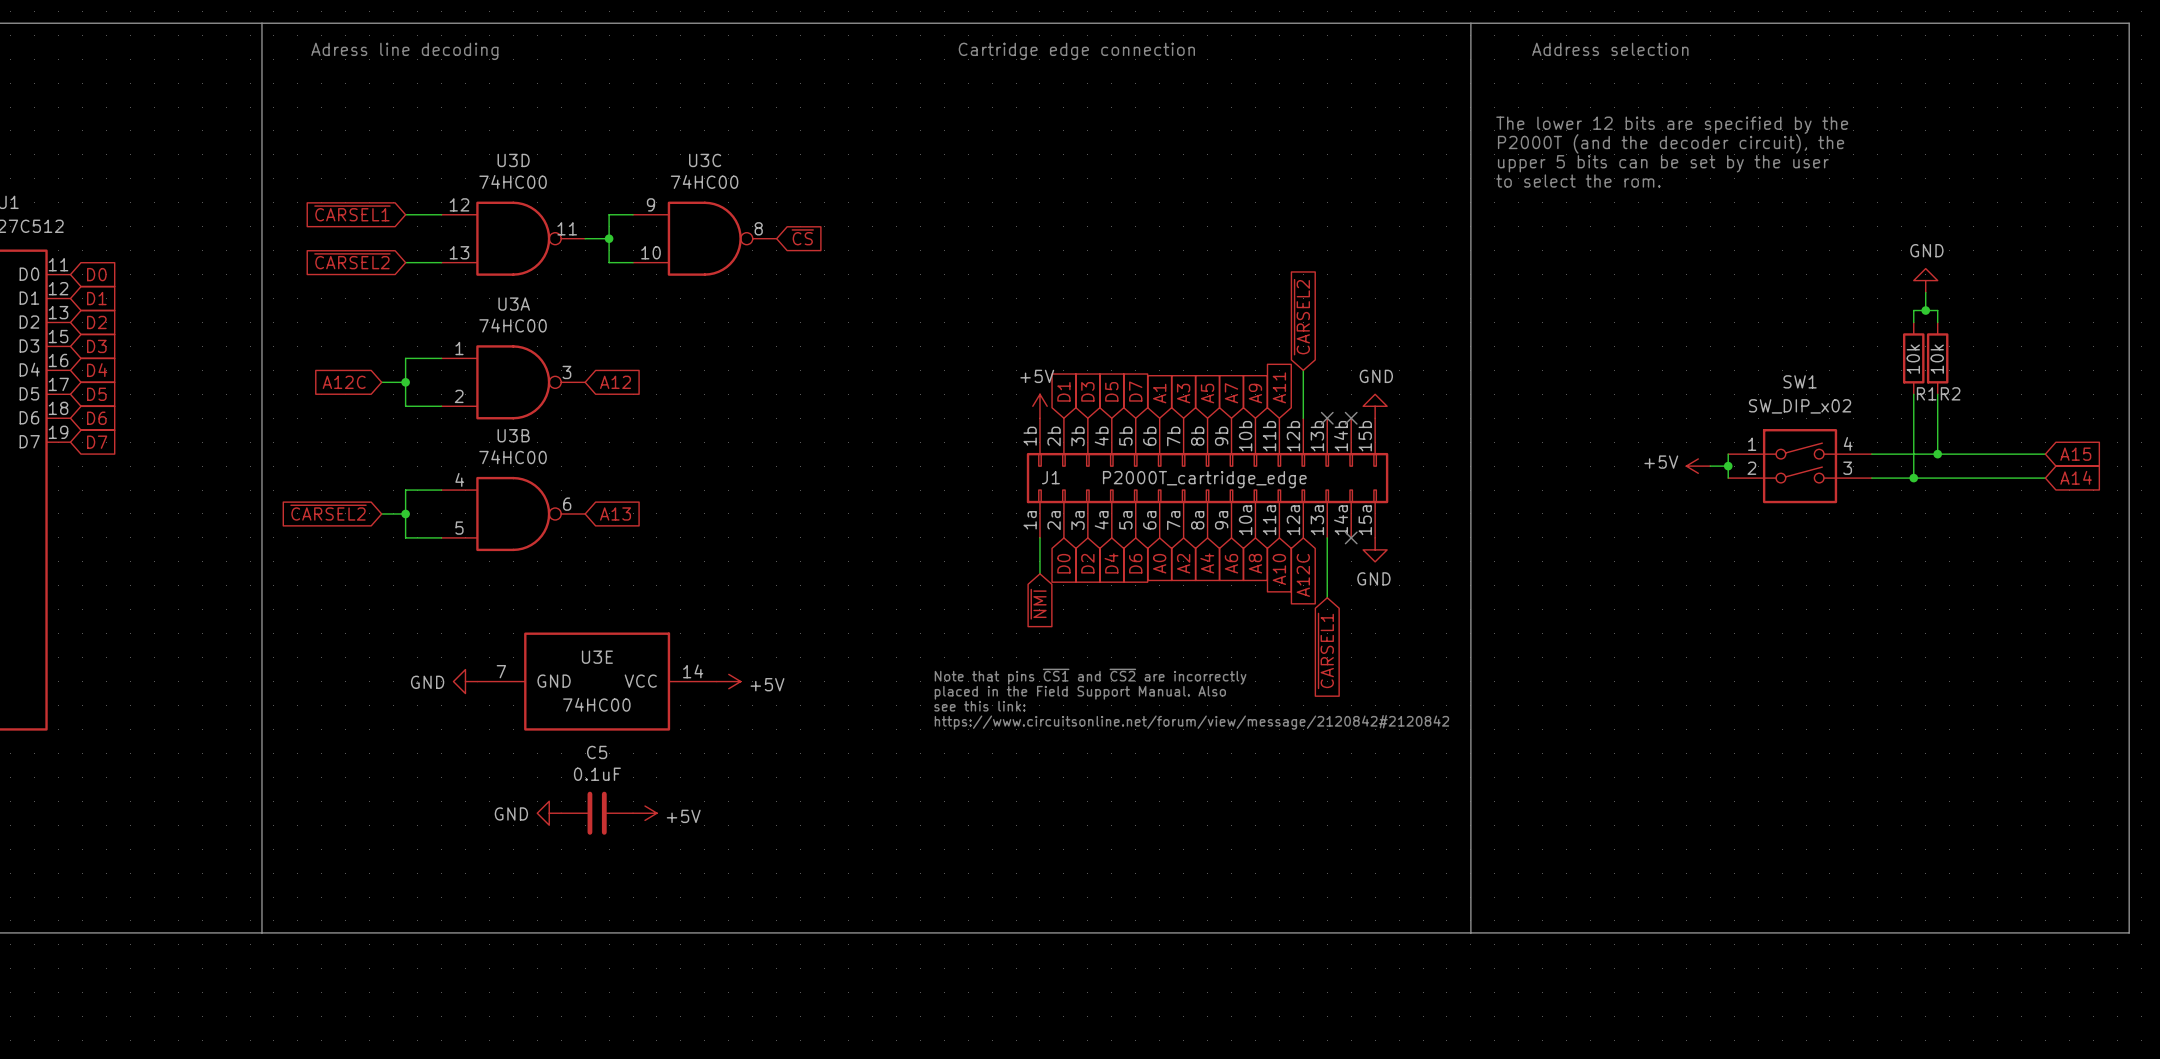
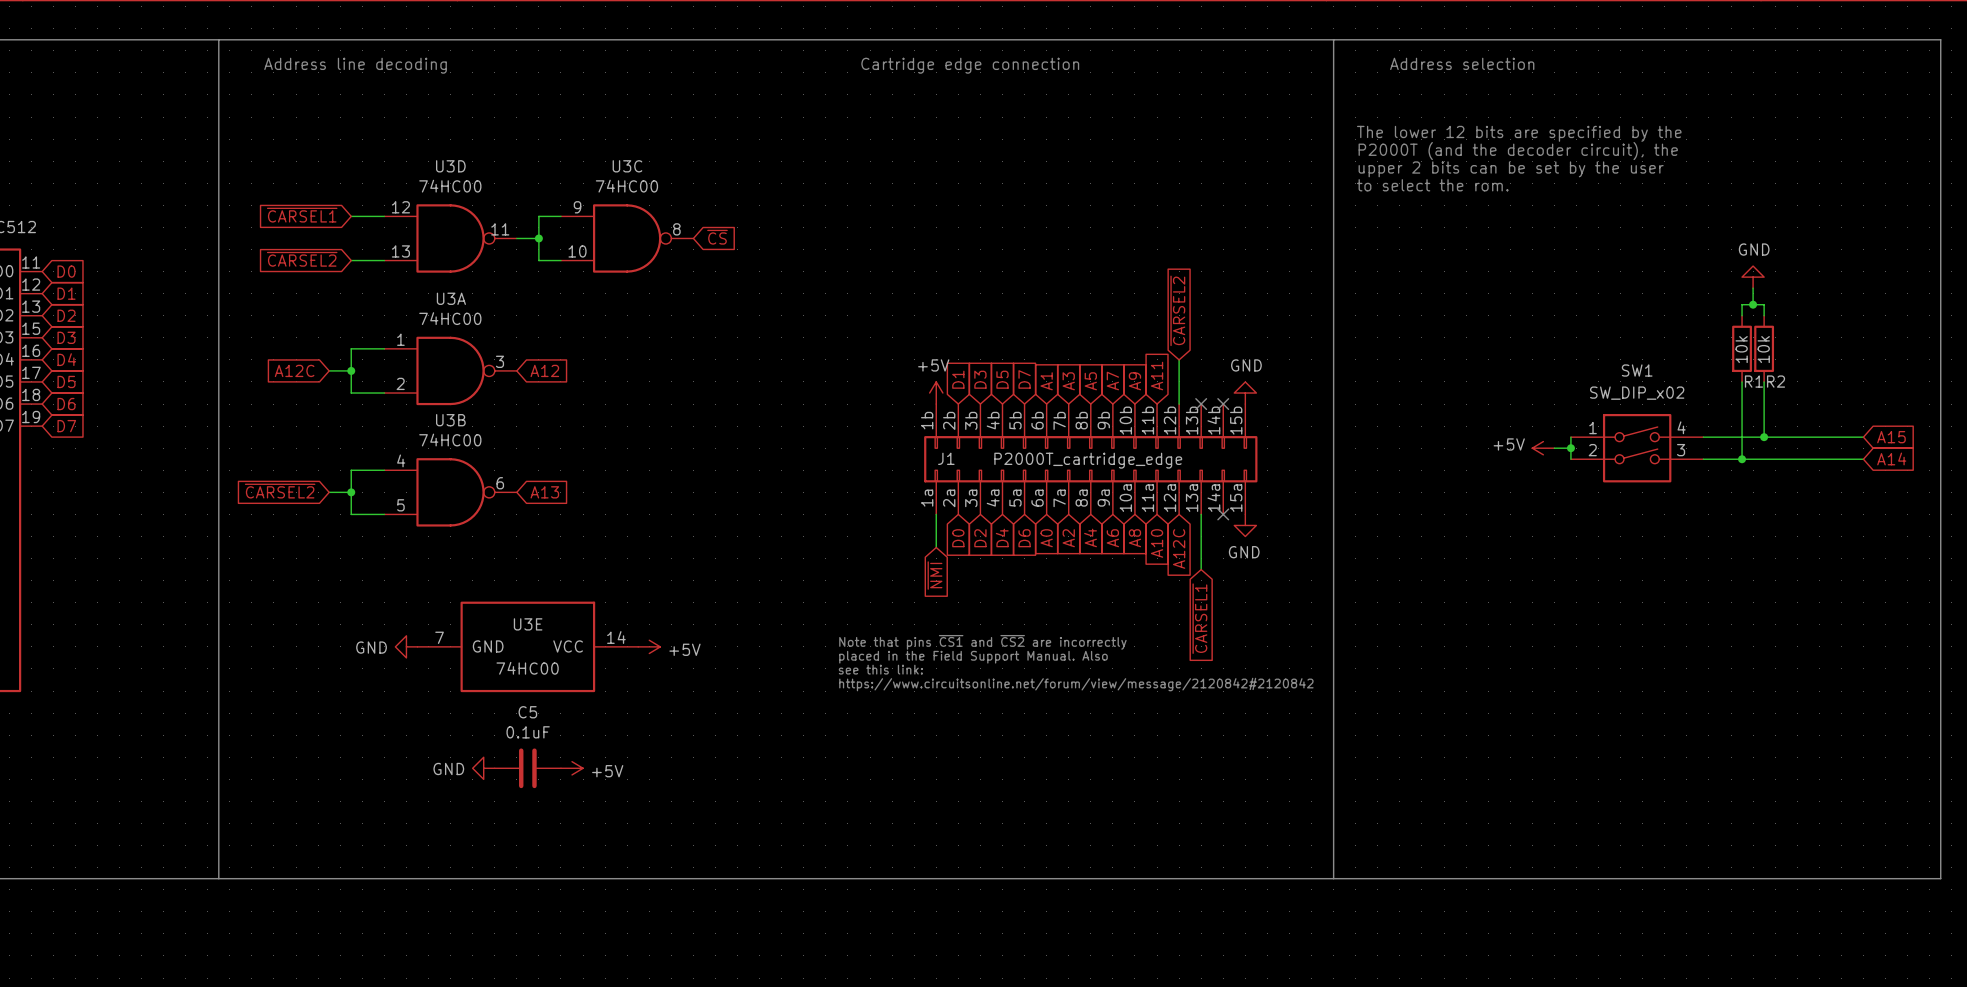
text: Adress line decoding (404, 51) -> Address line decoding (355, 65)
text: upper 5 bits can be set by the user (1663, 163) -> upper 2 bits can be set by the user (1511, 169)

